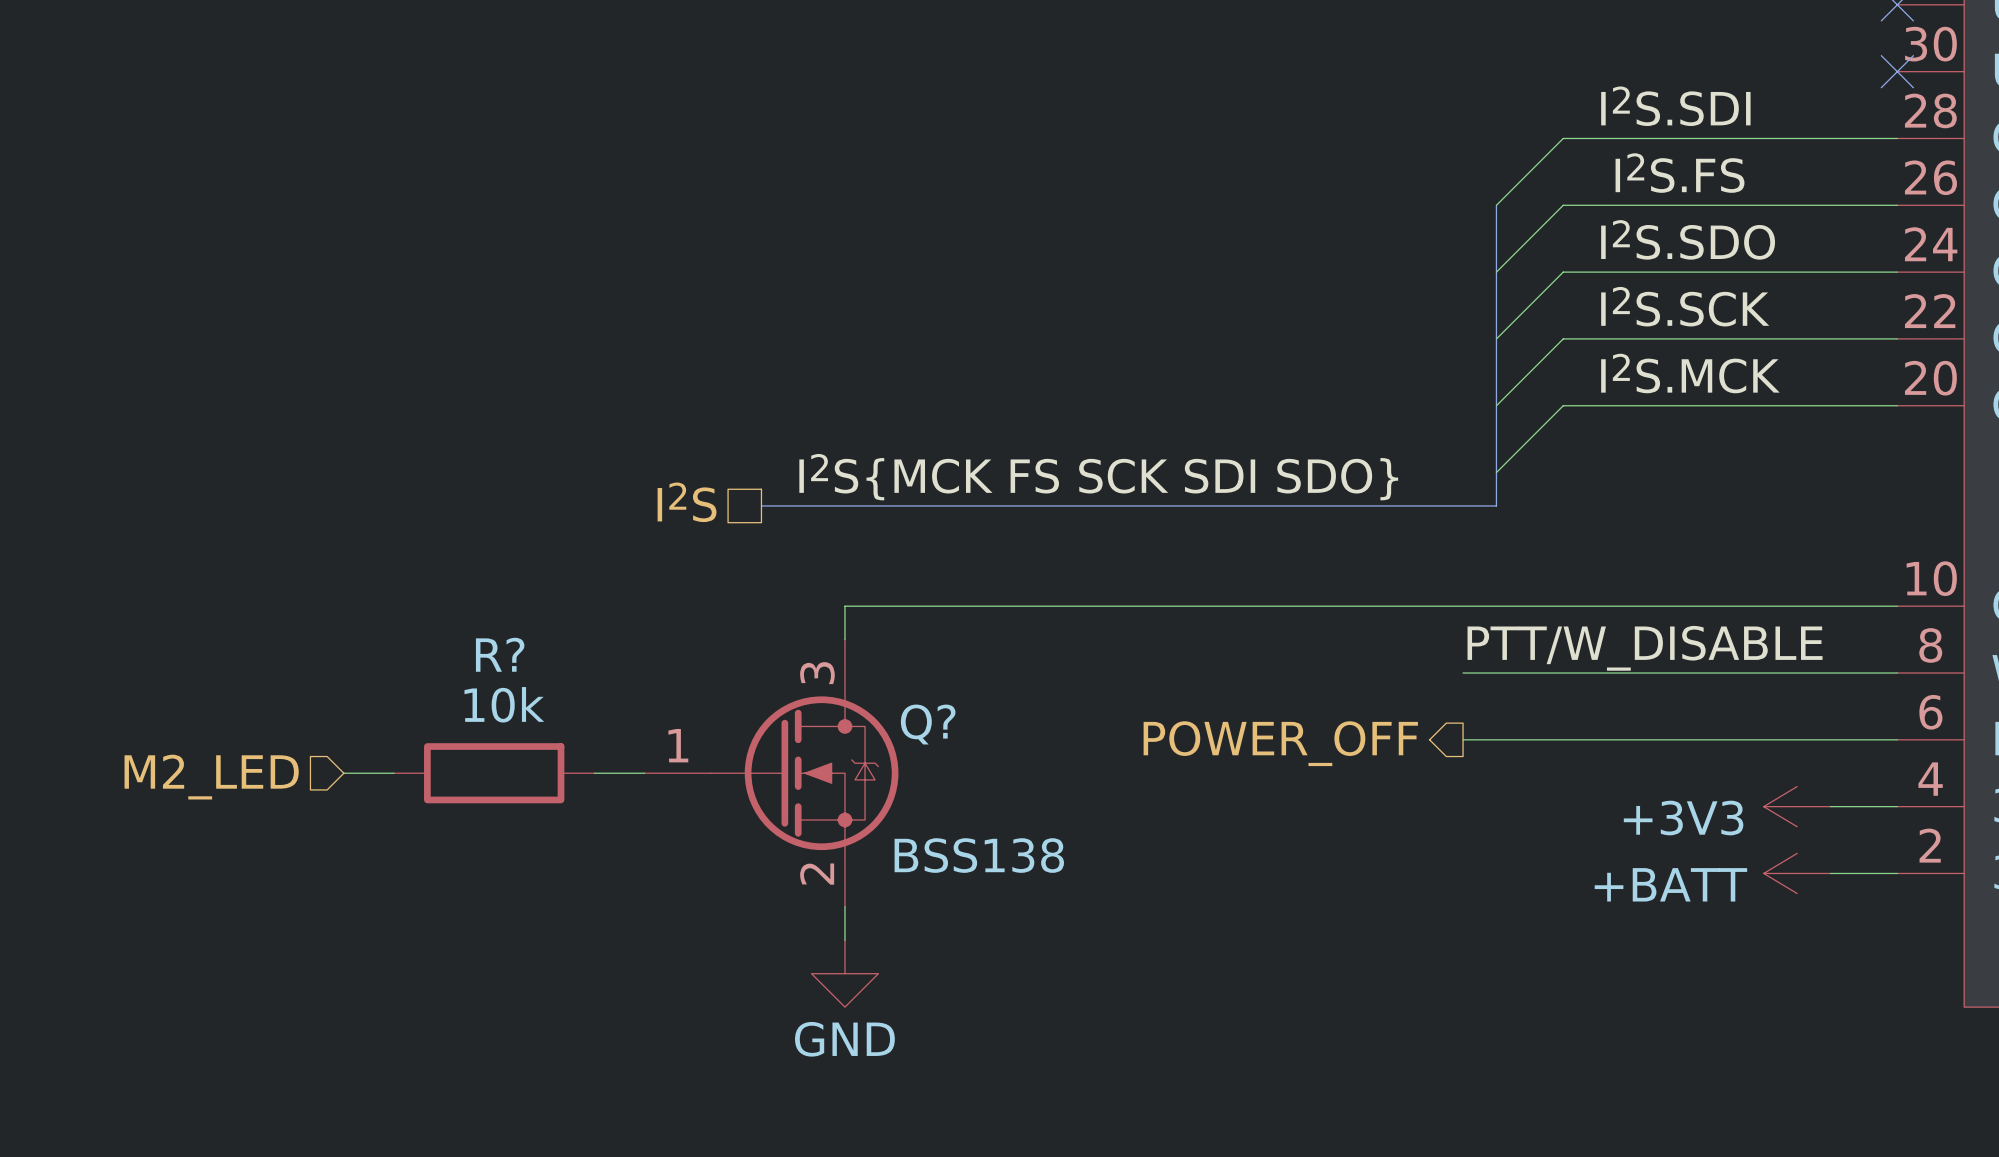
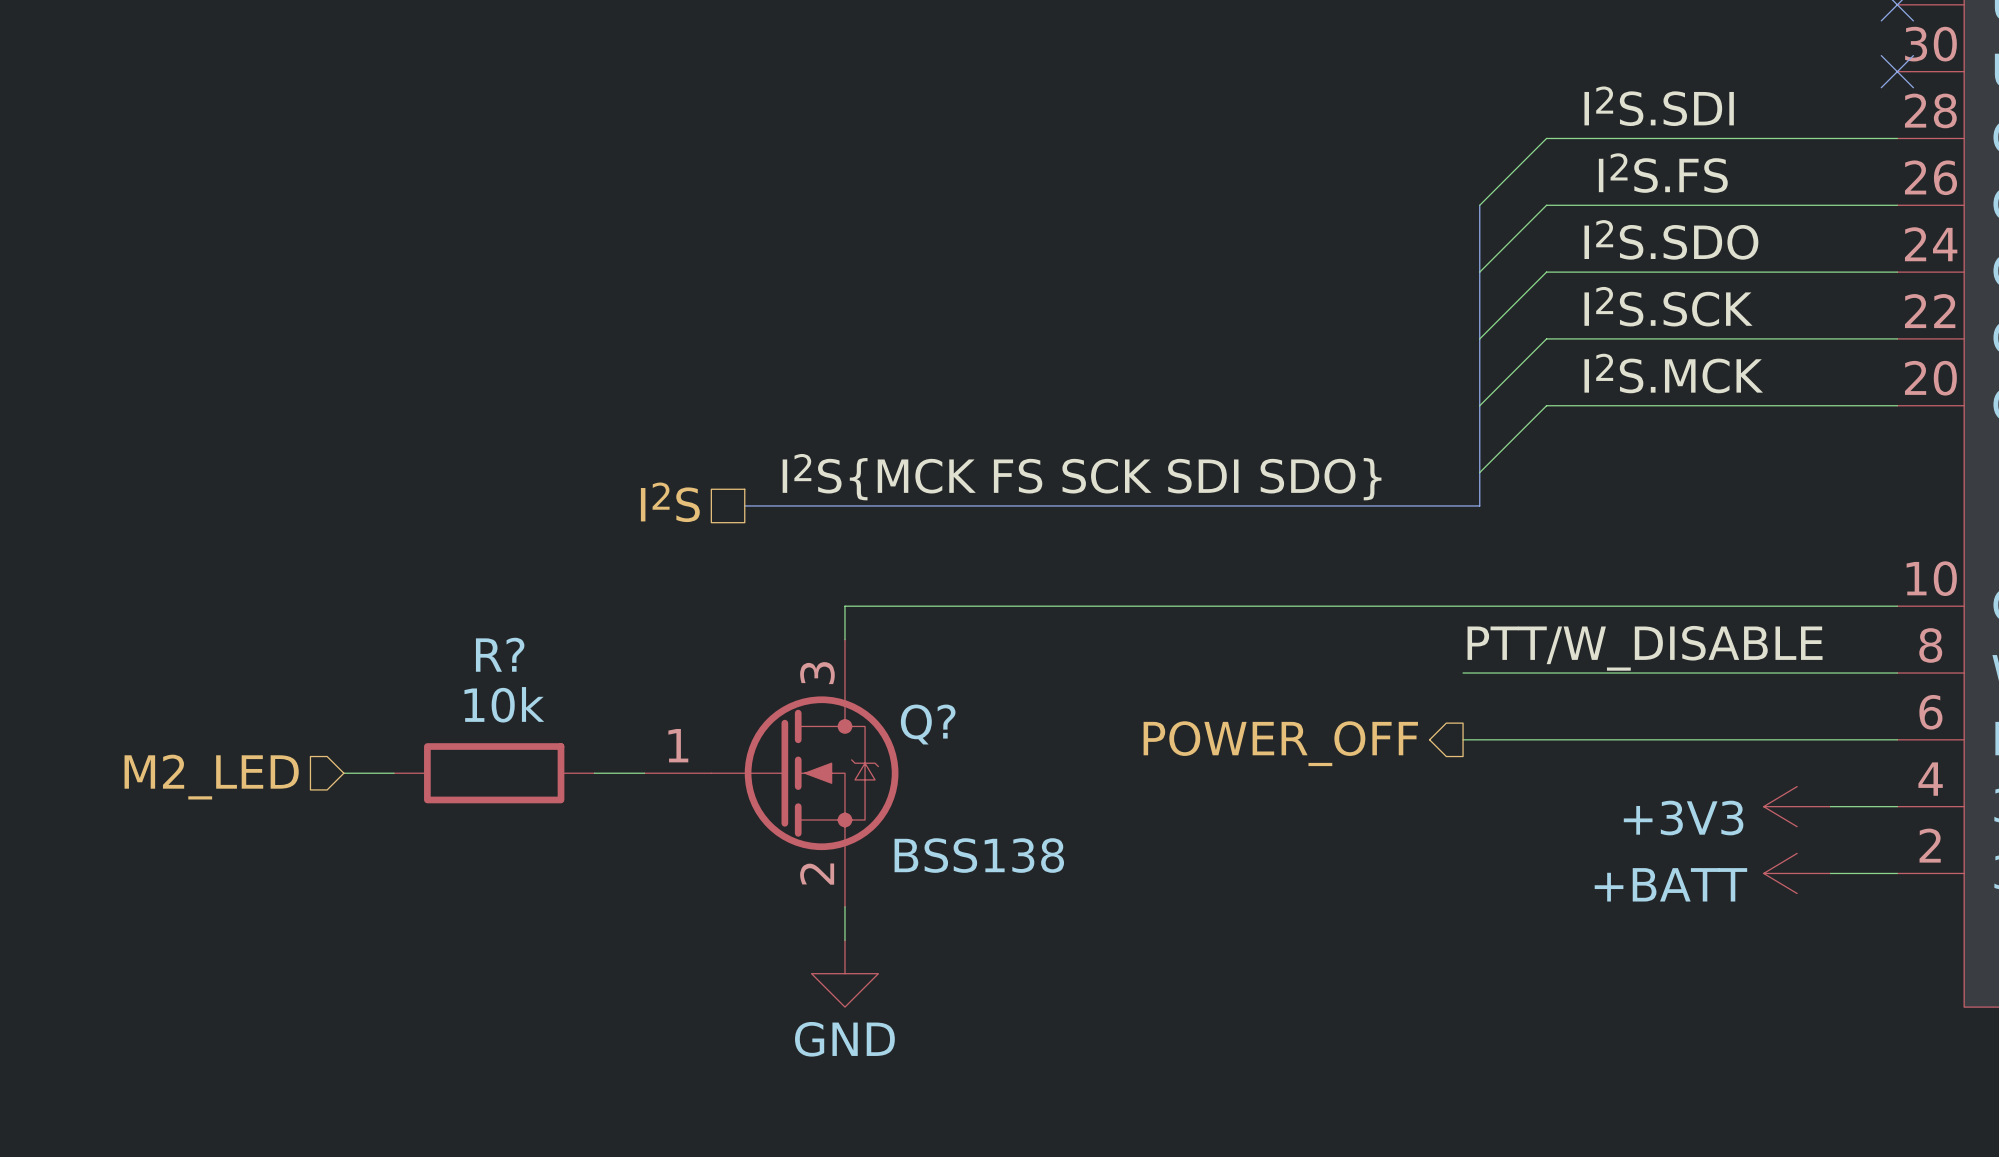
label position: I2S.SDI (1675, 106) -> I2S.SDI (1659, 106)
wire: none -> (1546, 138) (1479, 205)
wire: (1563, 138) (1496, 205) -> (1563, 138) (1546, 138)
label position: I2S.FS (1680, 173) -> I2S.FS (1663, 173)
bus: (1496, 205) (1496, 505) (1479, 505) -> (1479, 205) (1479, 505)
wire: none -> (1546, 205) (1479, 272)
wire: (1563, 205) (1496, 272) -> (1563, 205) (1546, 205)
label position: I2S.SDO (1688, 239) -> I2S.SDO (1671, 239)
wire: none -> (1546, 272) (1479, 338)
wire: (1563, 272) (1496, 338) -> (1563, 272) (1546, 272)
label position: I2S.SCK (1685, 306) -> I2S.SCK (1668, 306)
wire: none -> (1546, 338) (1479, 405)
wire: (1563, 338) (1496, 405) -> (1563, 338) (1546, 338)
label position: I2S.MCK (1690, 373) -> I2S.MCK (1673, 373)
wire: none -> (1546, 405) (1479, 472)
wire: (1563, 405) (1496, 472) -> (1563, 405) (1546, 405)
label position: I2S{MCK FS SCK SDI SDO} (1098, 477) -> I2S{MCK FS SCK SDI SDO} (1082, 477)
hierarchical label position: I2S (687, 502) -> I2S (670, 502)
bus: none -> (744, 505) (761, 505)

